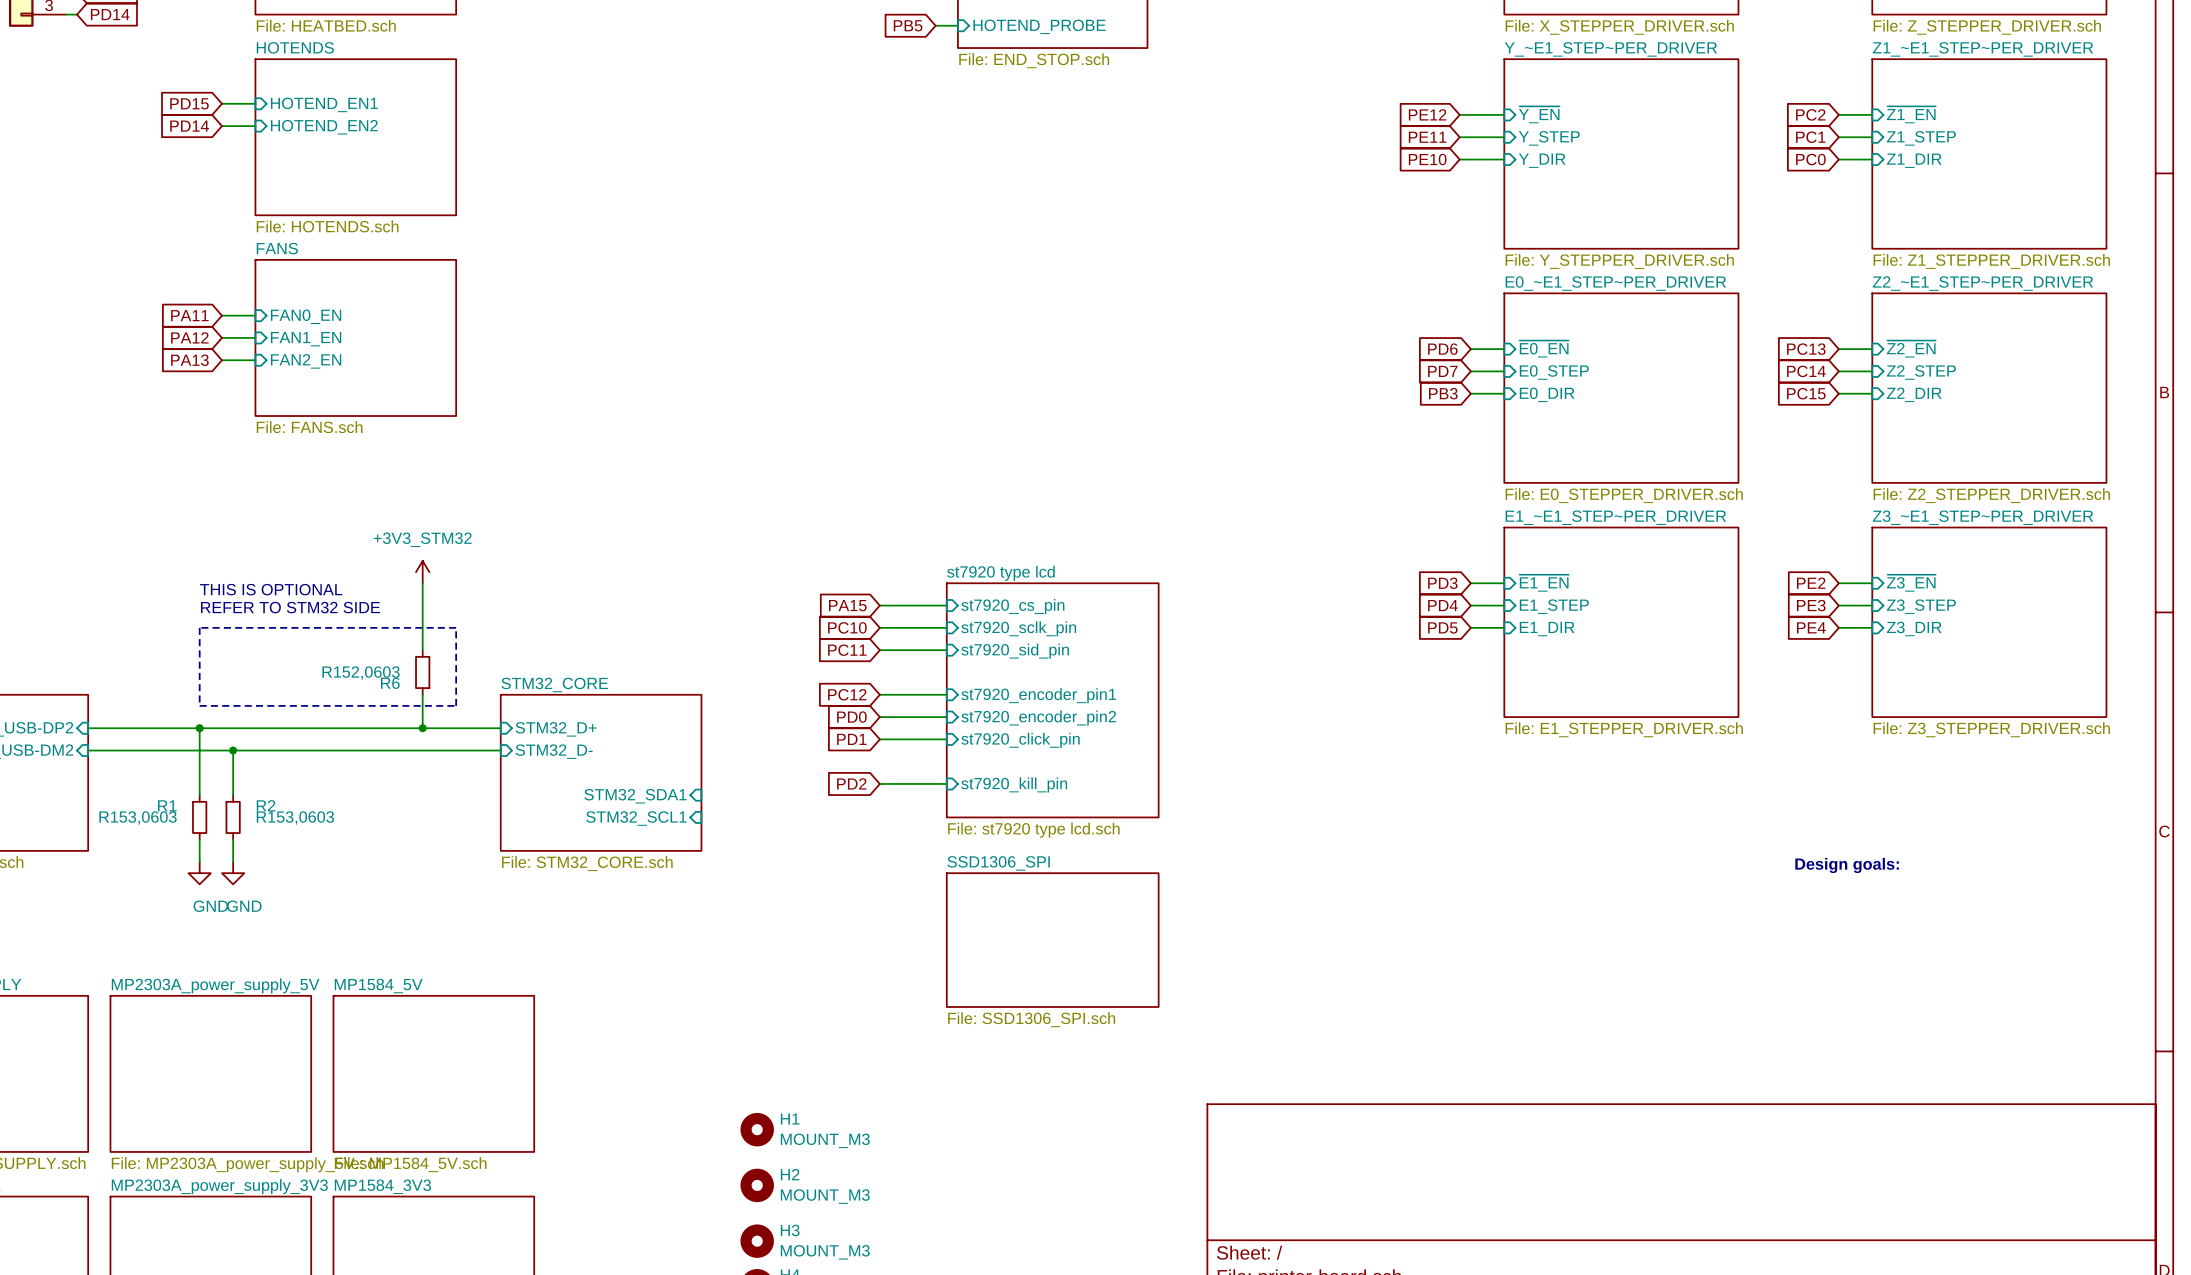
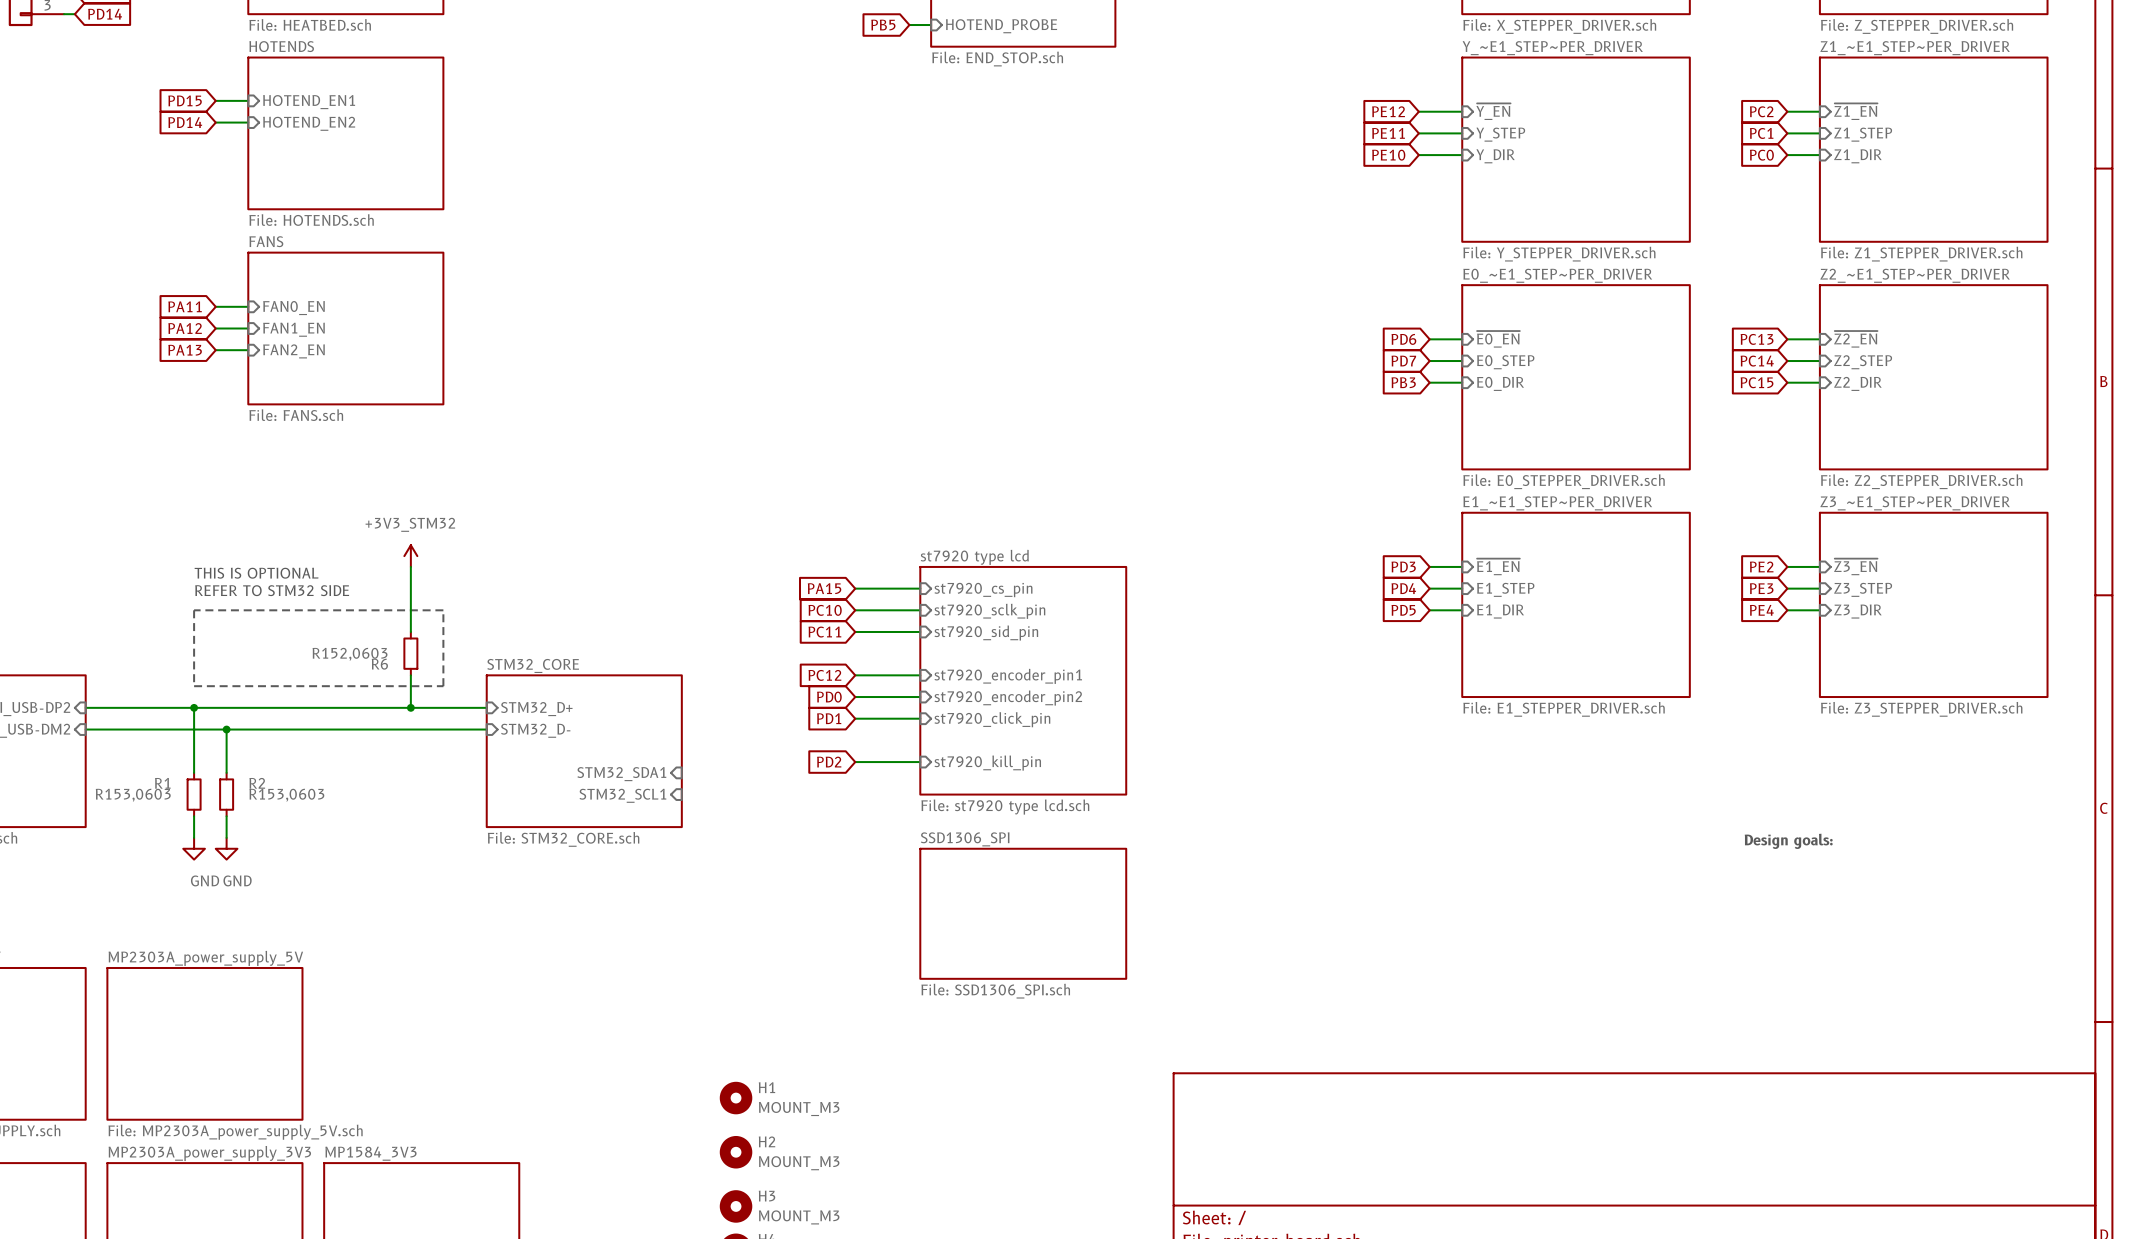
sheet MP1584_5V: File: MP1584_5V.sch (433, 1073) -> none

